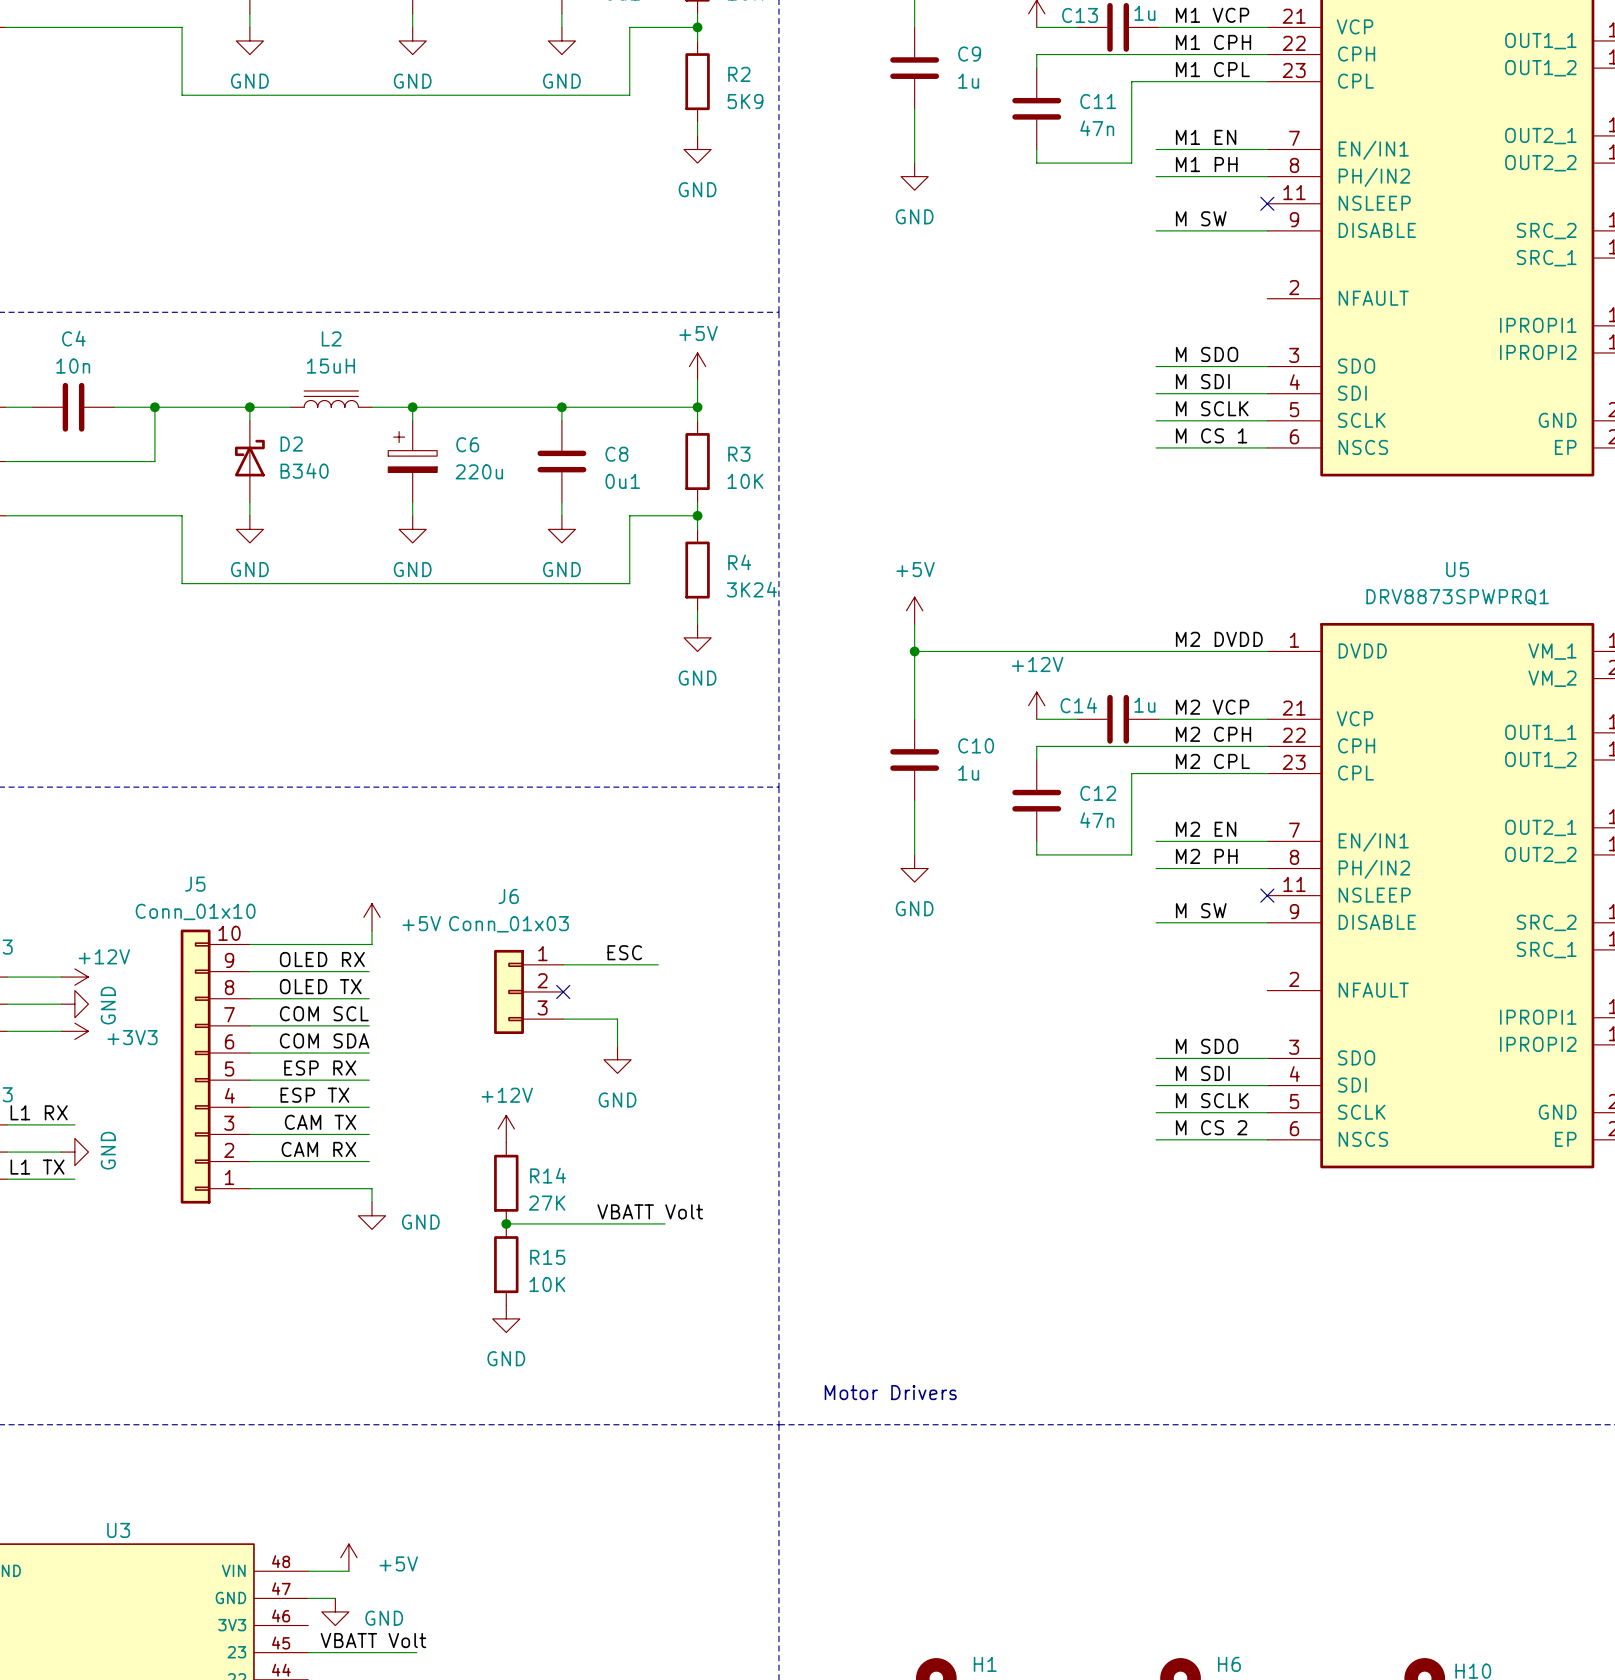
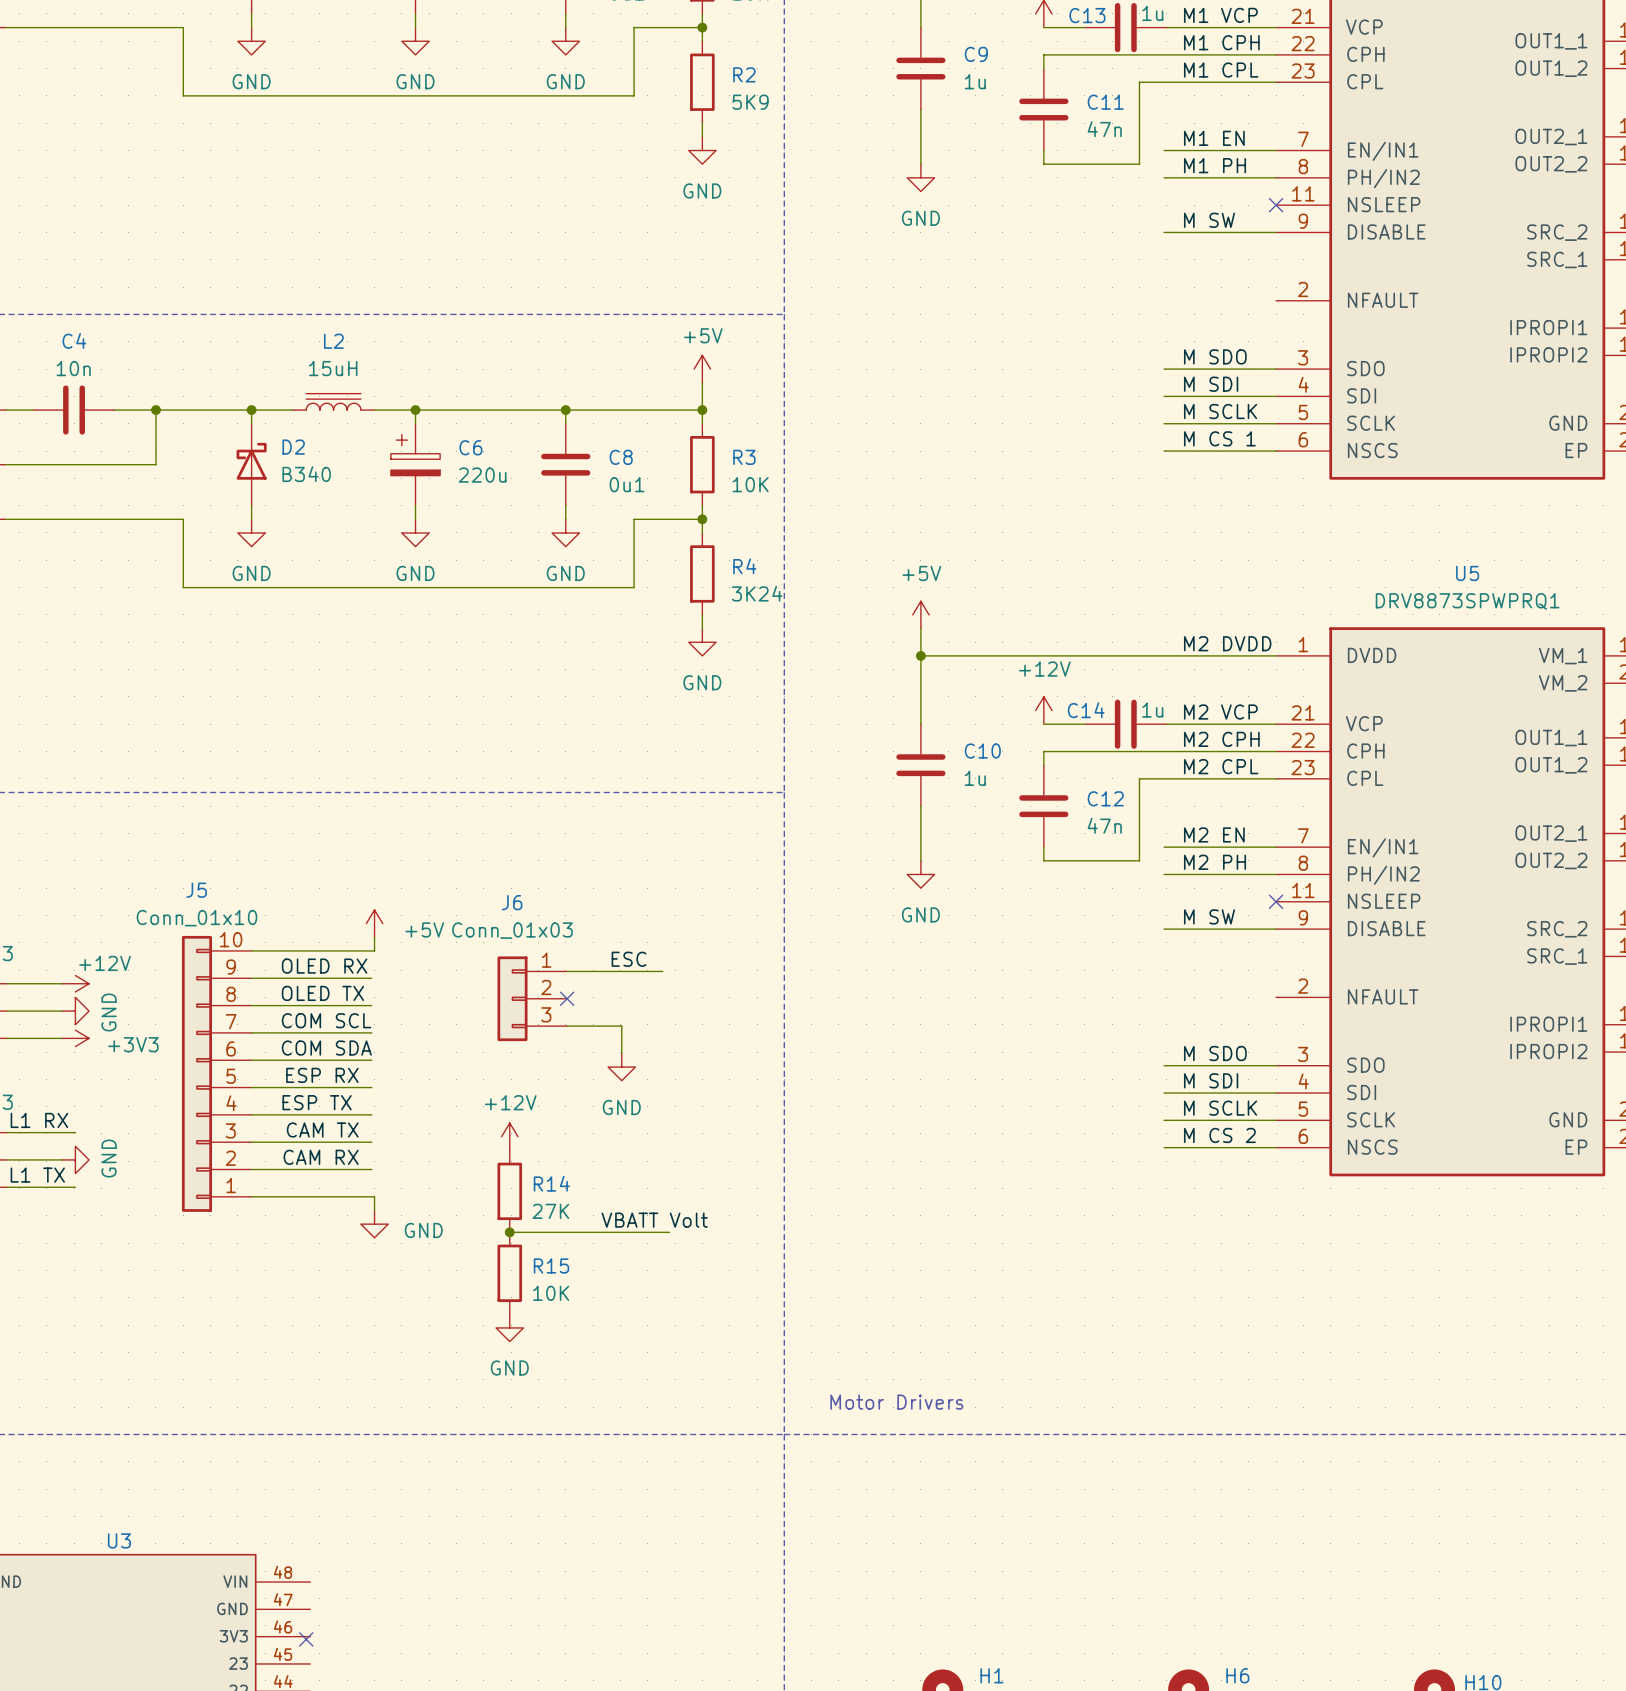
power symbol: +5V (348, 1557) -> none
wire: (308, 1571) (348, 1571) -> none
wire: (308, 1598) (335, 1598) -> none
power symbol: GND (335, 1611) -> none
no-connect mark: none -> (306, 1639)
label: VBATT Volt (373, 1640) -> none
wire: (308, 1652) (416, 1652) -> none

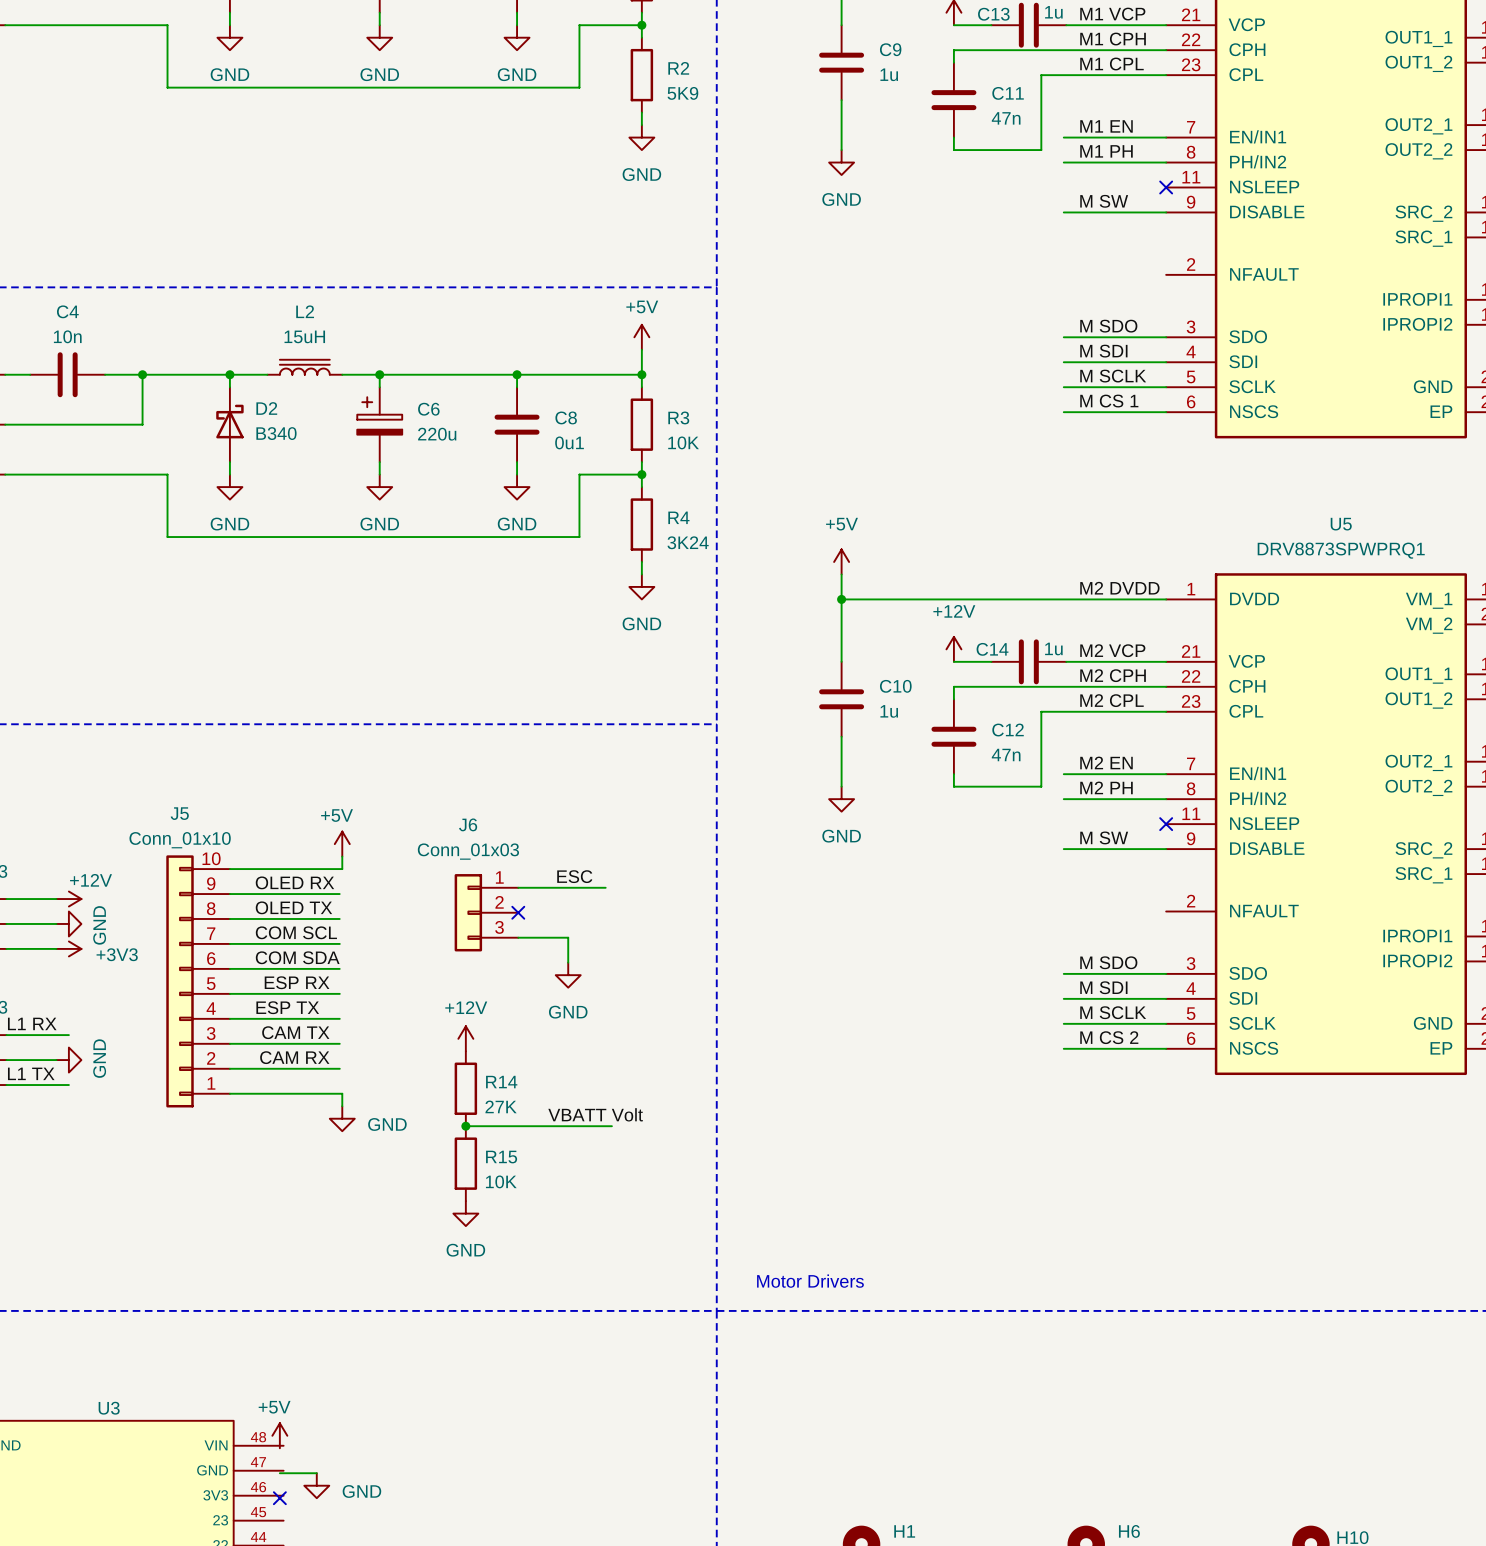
power symbol text position: +5V (424, 929) -> +5V (337, 815)
power symbol: none -> +5V (279, 1435)
wire: none -> (279, 1473) (316, 1473)
power symbol: none -> GND (316, 1485)

